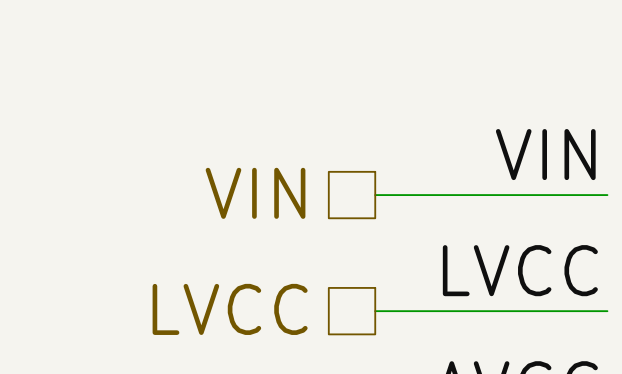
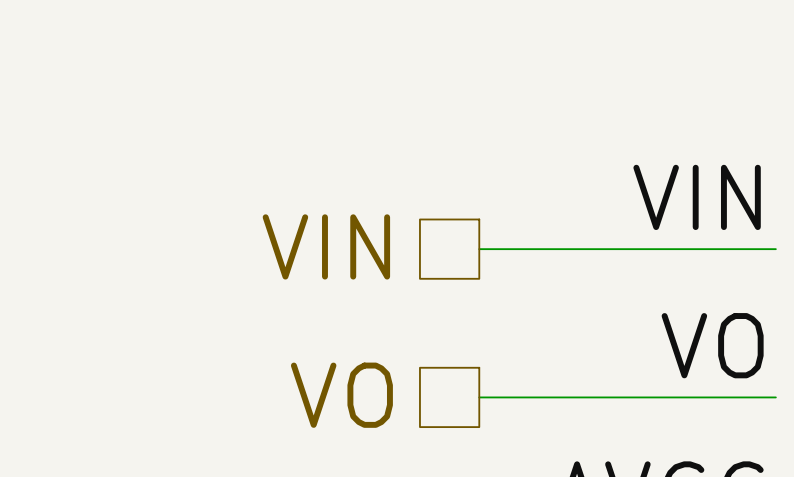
label: LVCC (520, 270) -> VO (712, 345)
hierarchical label: LVCC (230, 309) -> VO (341, 395)

